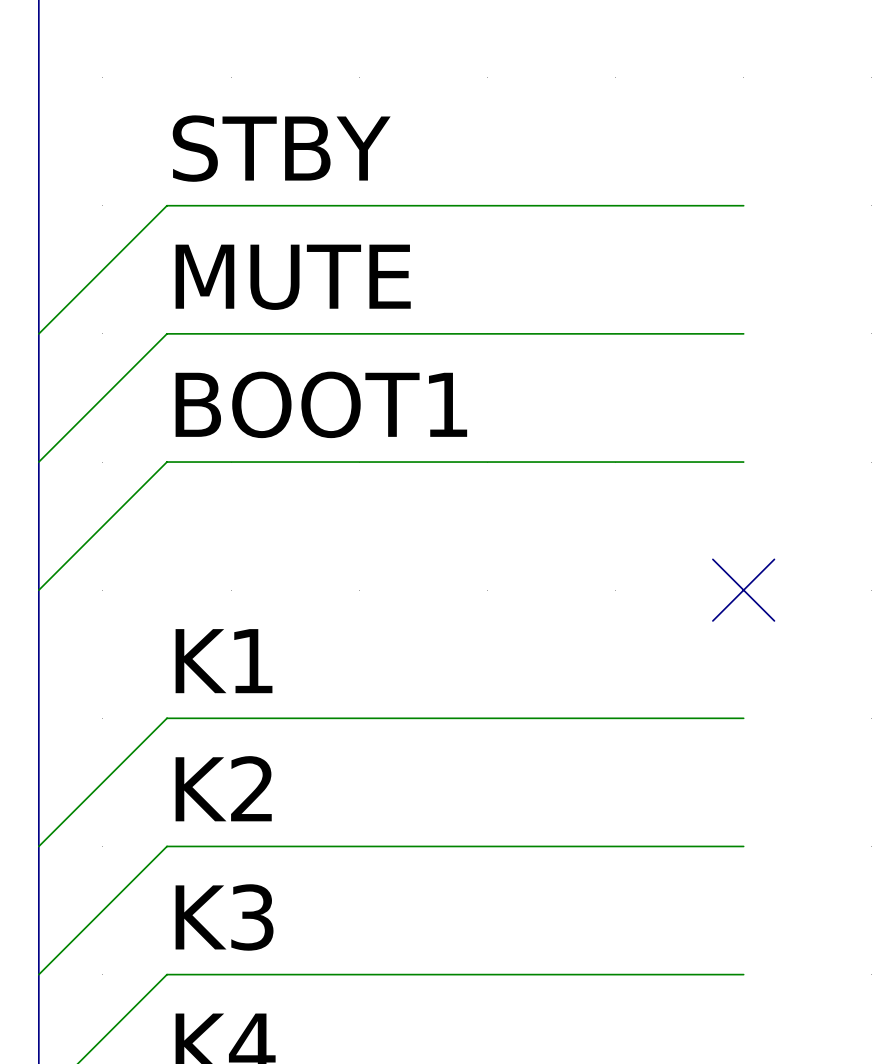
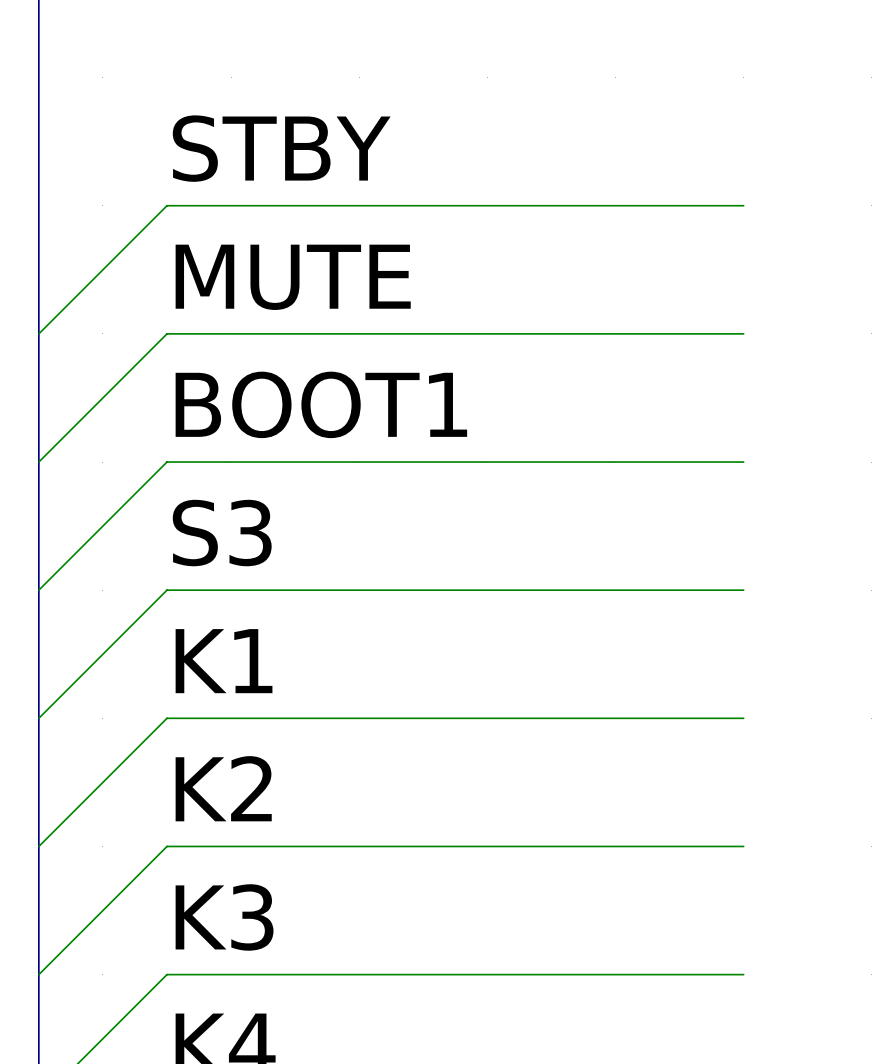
label: none -> S3 (222, 533)
wire: none -> (743, 590) (166, 590) (38, 718)
no-connect mark: (743, 590) -> none

